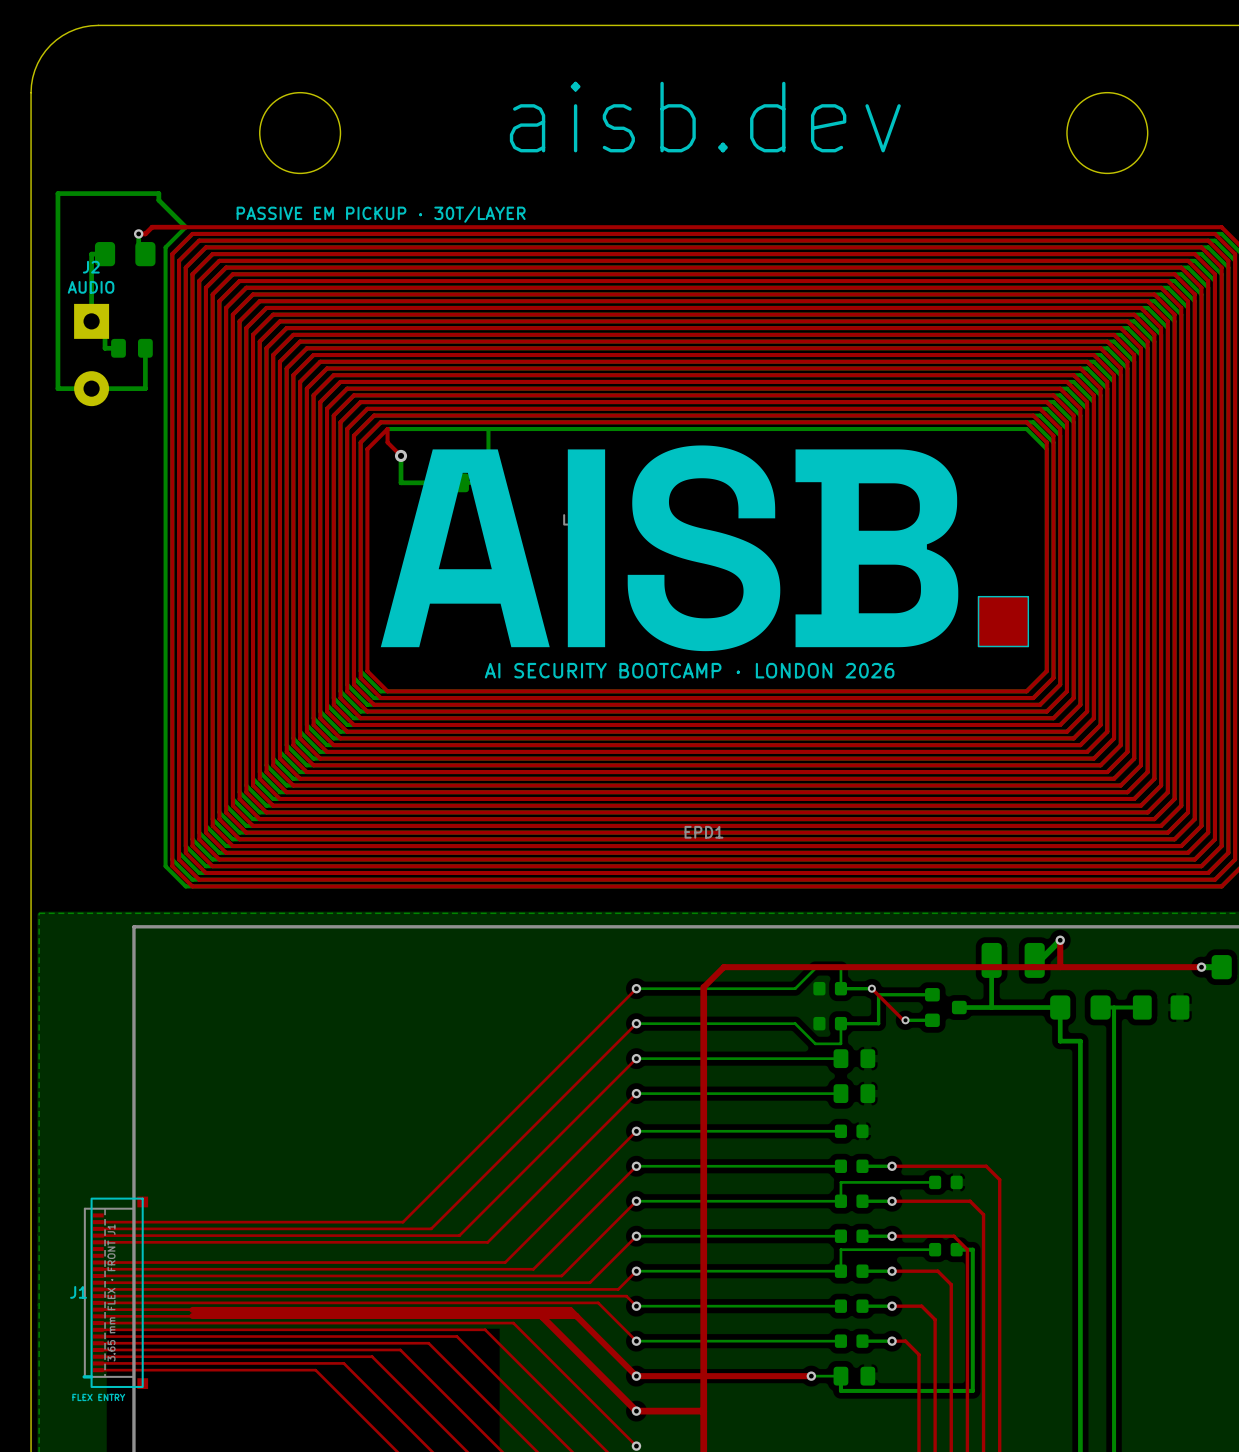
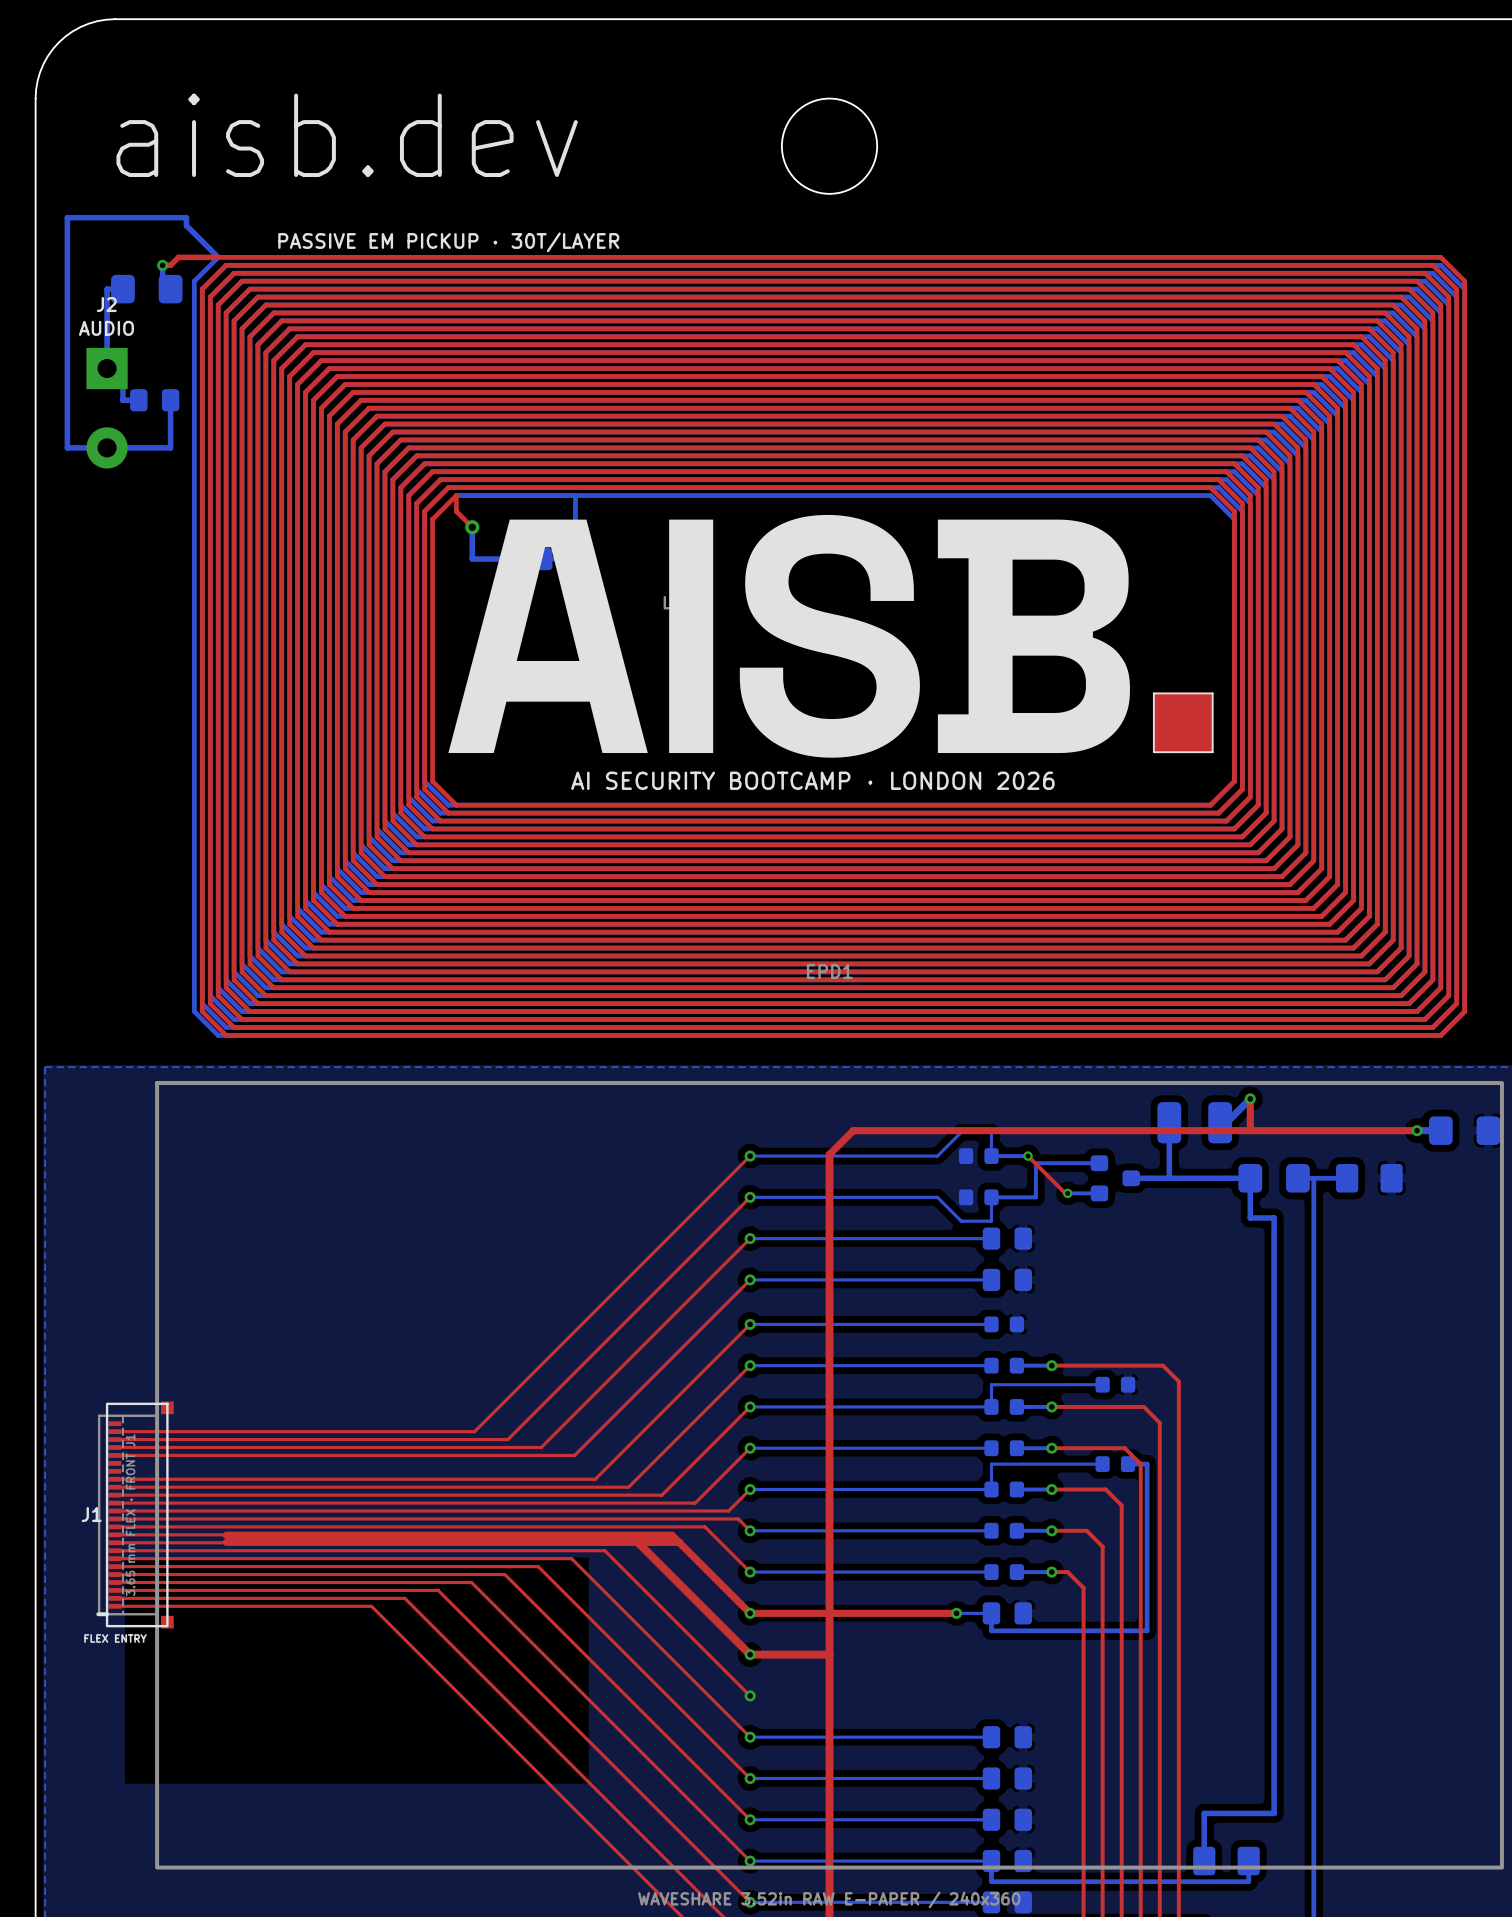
round board edge: [259, 92, 342, 175] -> none
round board edge: none -> [781, 97, 878, 195]
round board edge: [1066, 92, 1149, 175] -> none
text: aisb.dev (705, 117) -> none
text: none -> aisb.dev (347, 135)

